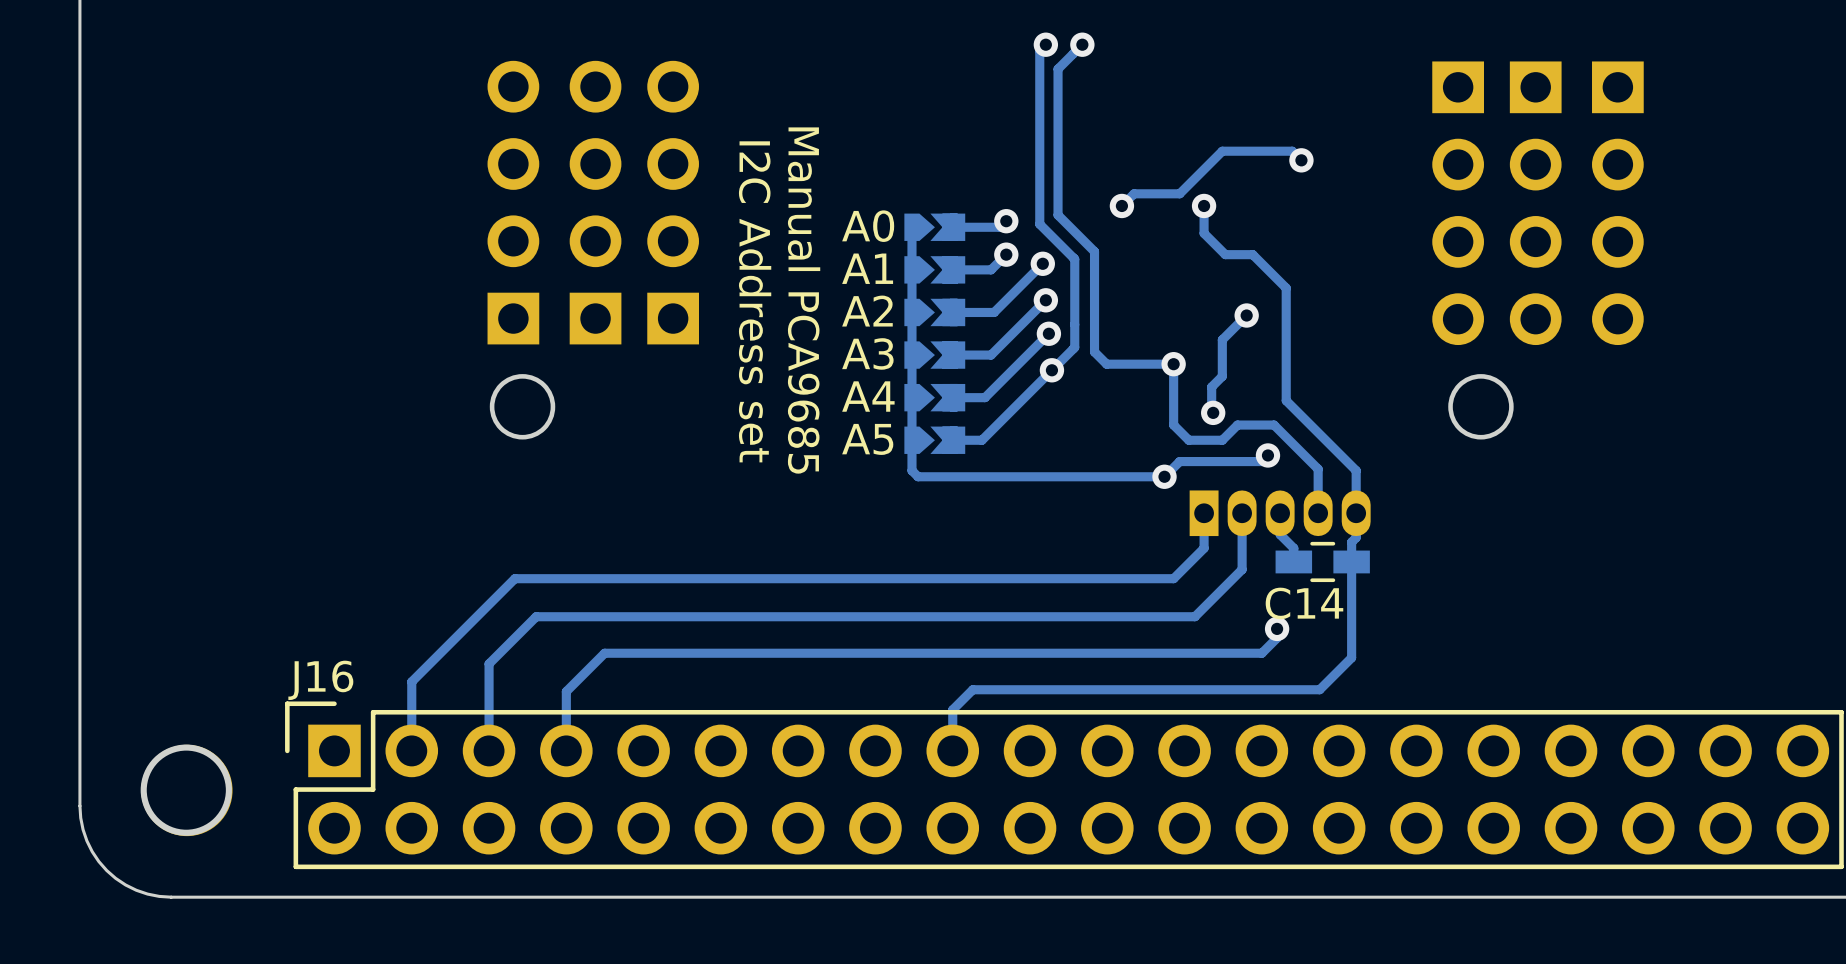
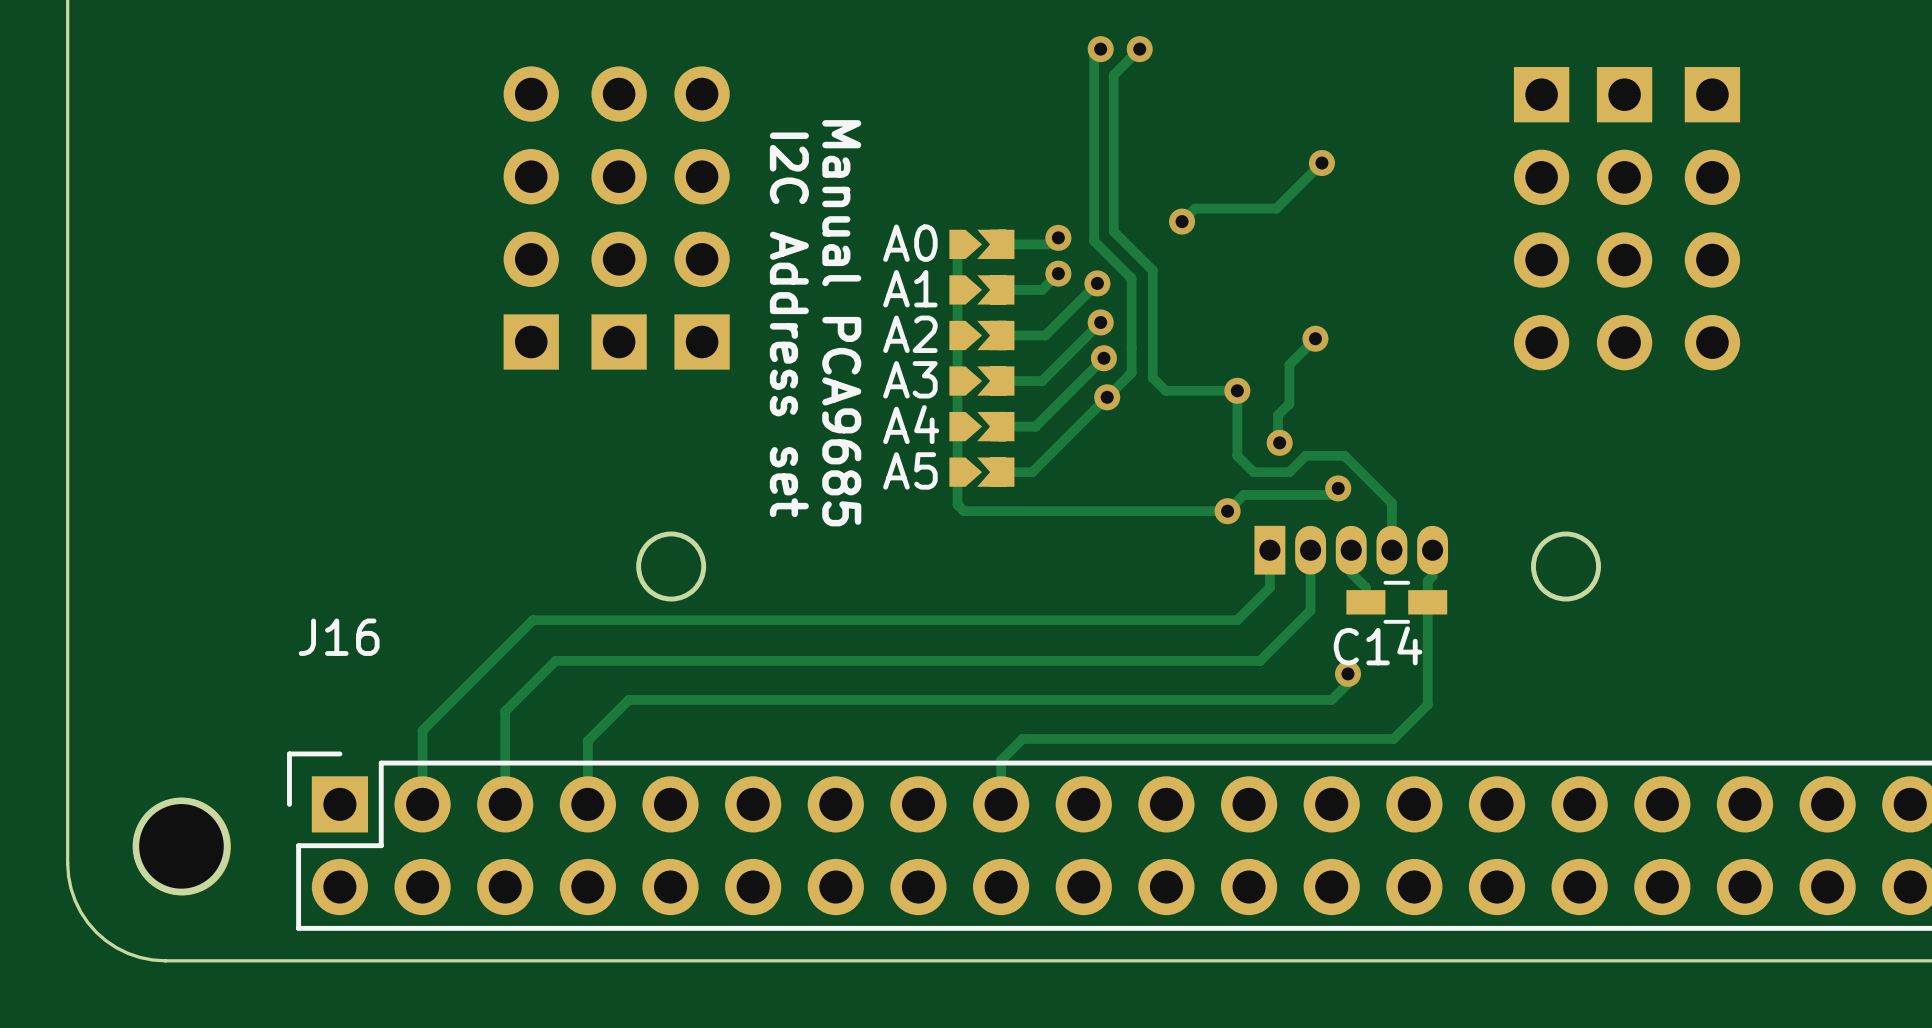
via: none -> (1321, 163)
track: (1301, 160) (1292, 151) (1222, 151) (1179, 193) -> (1321, 163) (1276, 208) (1243, 208)
via: (1301, 160) -> none
track: (1204, 205) (1204, 233) (1225, 254) (1252, 254) (1286, 288) (1286, 400) (1356, 470) (1356, 513) -> none
via: (1204, 205) -> none
round board edge position: (522, 406) -> (671, 566)
round board edge position: (1480, 406) -> (1566, 566)
J16 name position: J16 (320, 680) -> J16 (339, 637)

